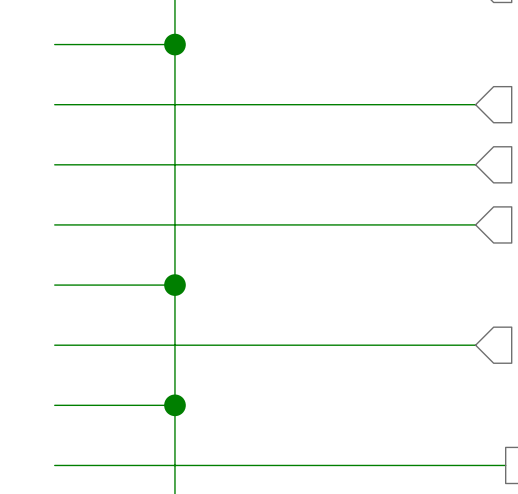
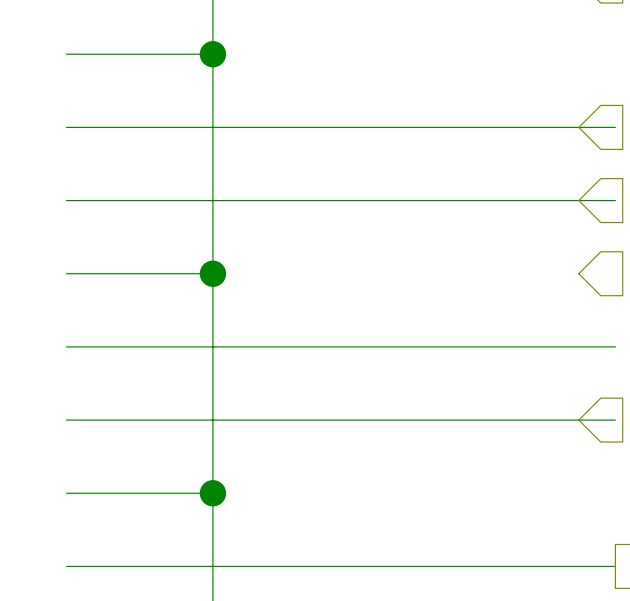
wire: none -> (578, 127) (615, 127)
wire: none -> (578, 200) (615, 200)
wire: (174, 224) (475, 224) -> none
wire: none -> (212, 346) (615, 346)
junction position: (174, 285) -> (212, 273)
wire: none -> (578, 420) (615, 420)

